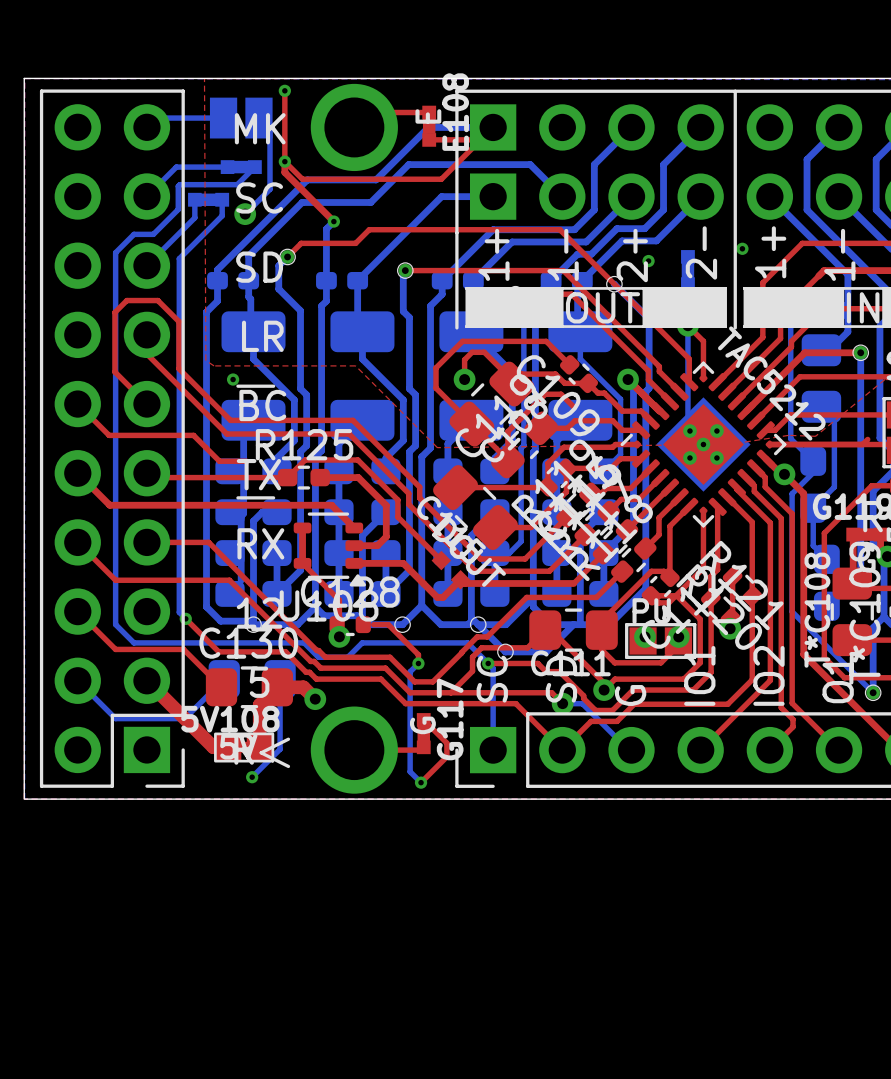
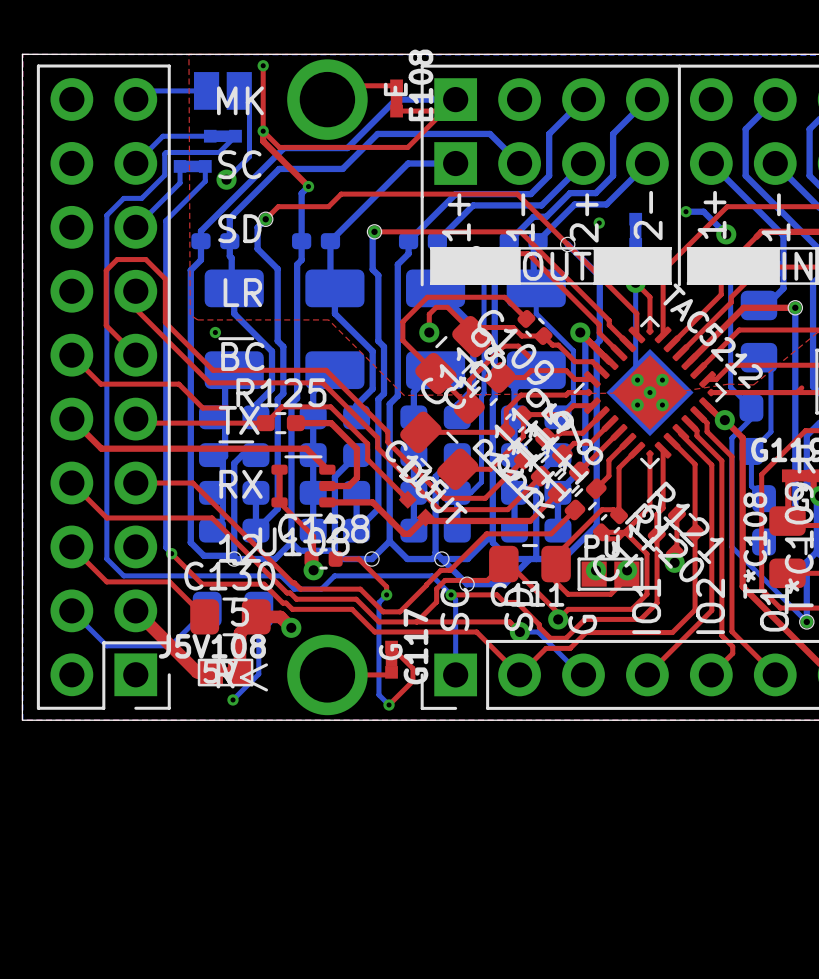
top track: (802, 243) (762, 282) (762, 337) (718, 382) -> (741, 206) (727, 206) (663, 270) (663, 334)
bottom track: none -> (686, 211) (703, 211) (726, 234)
via: none -> (726, 234)
5V108 name: 5V108 (230, 719) -> J5V108 (212, 646)

